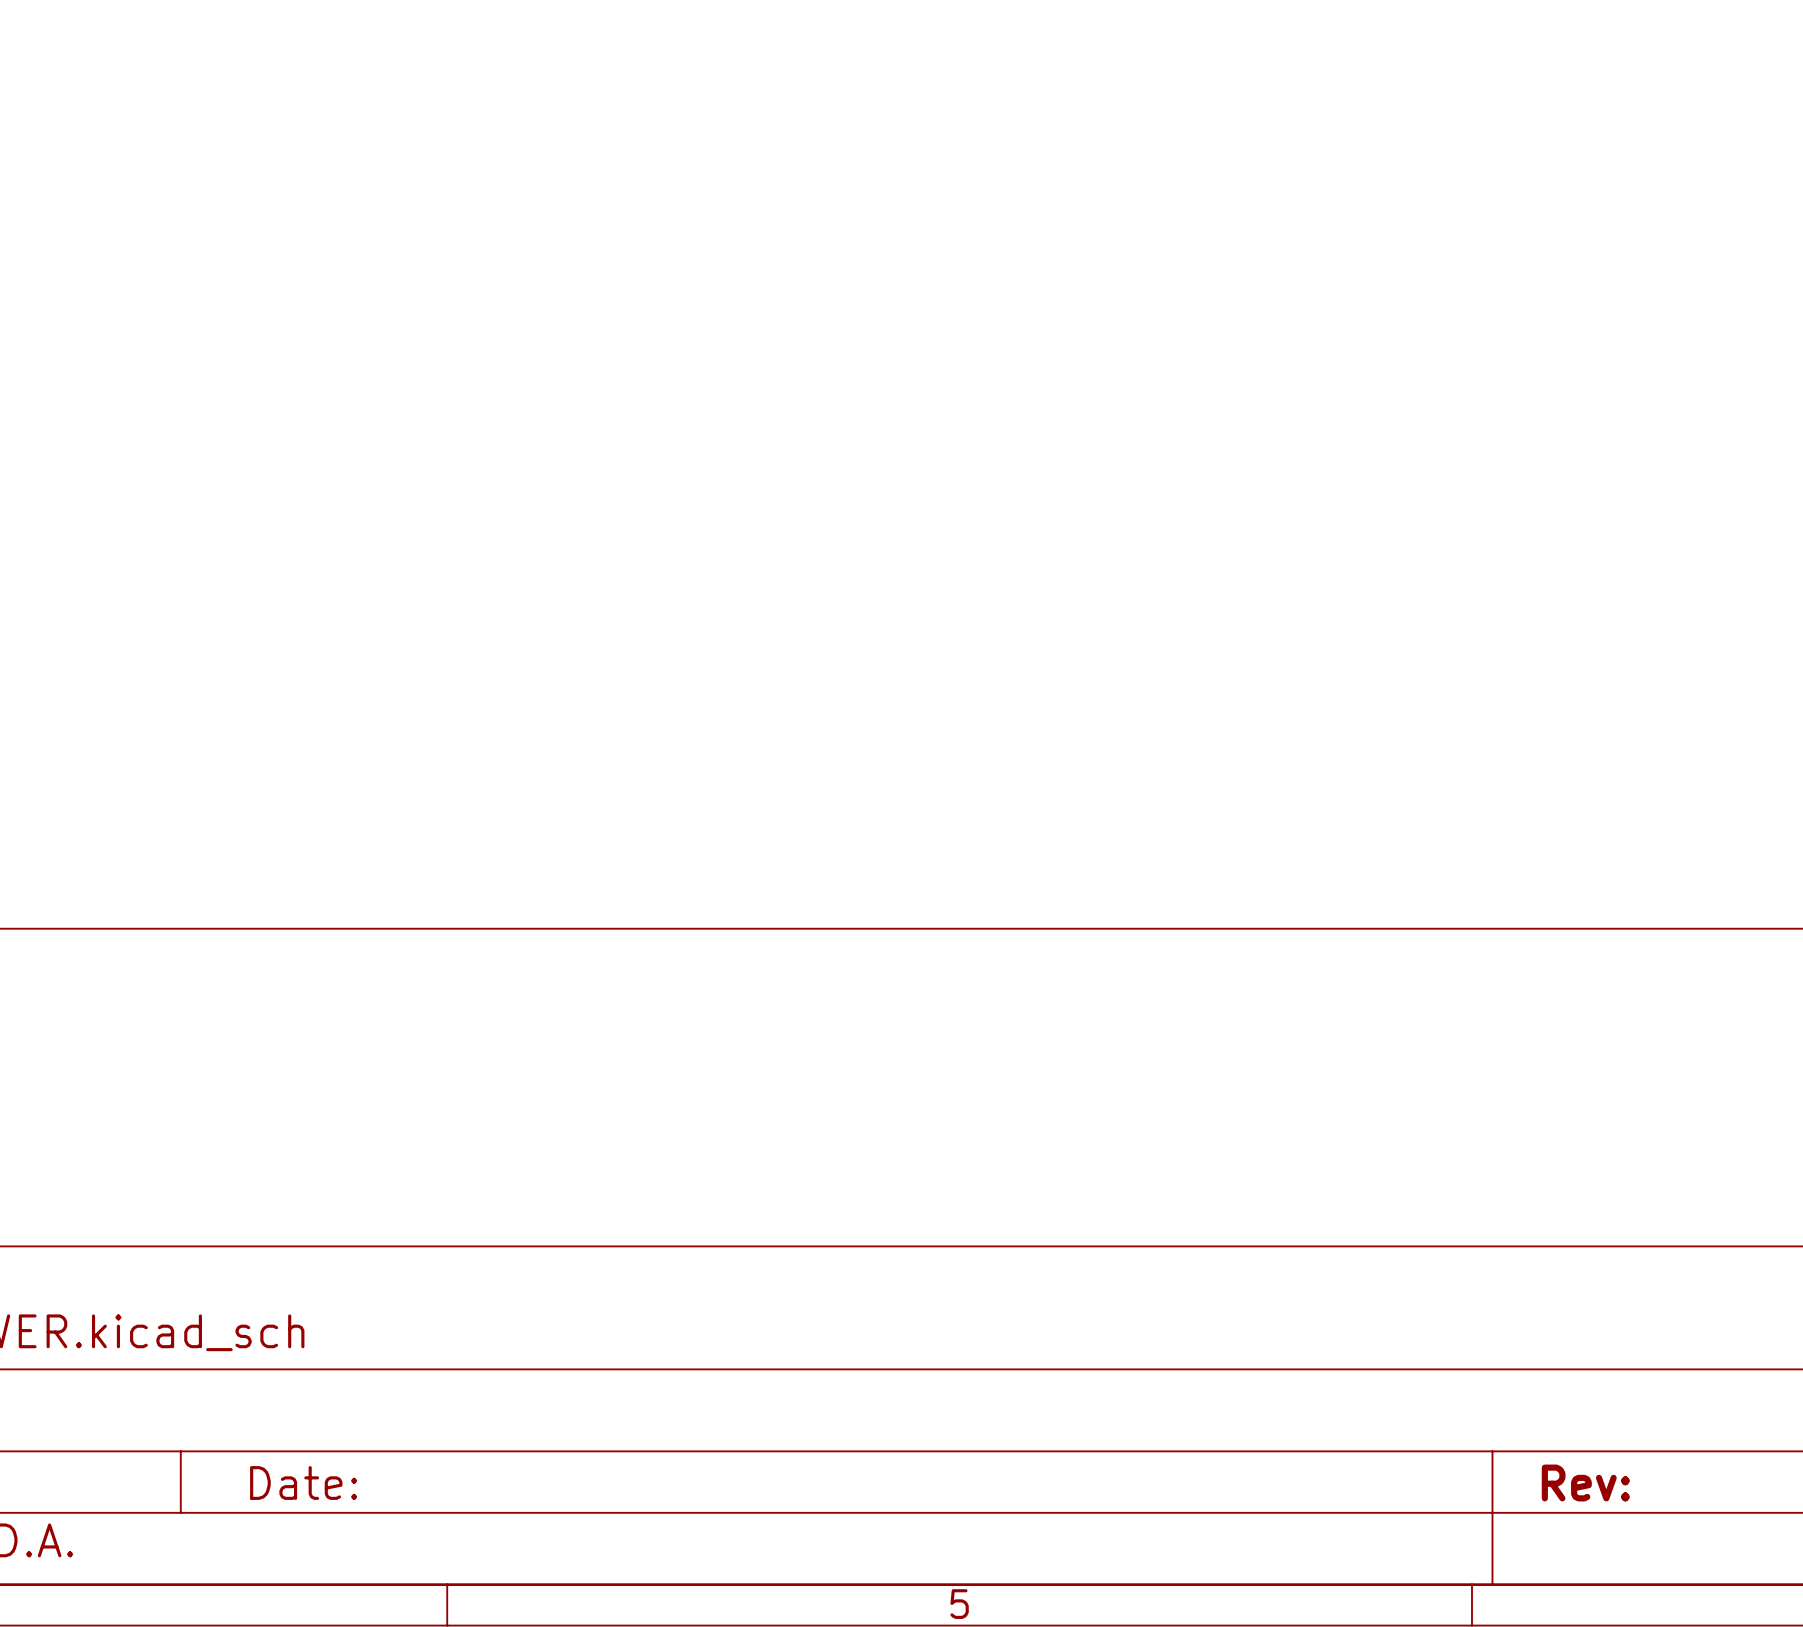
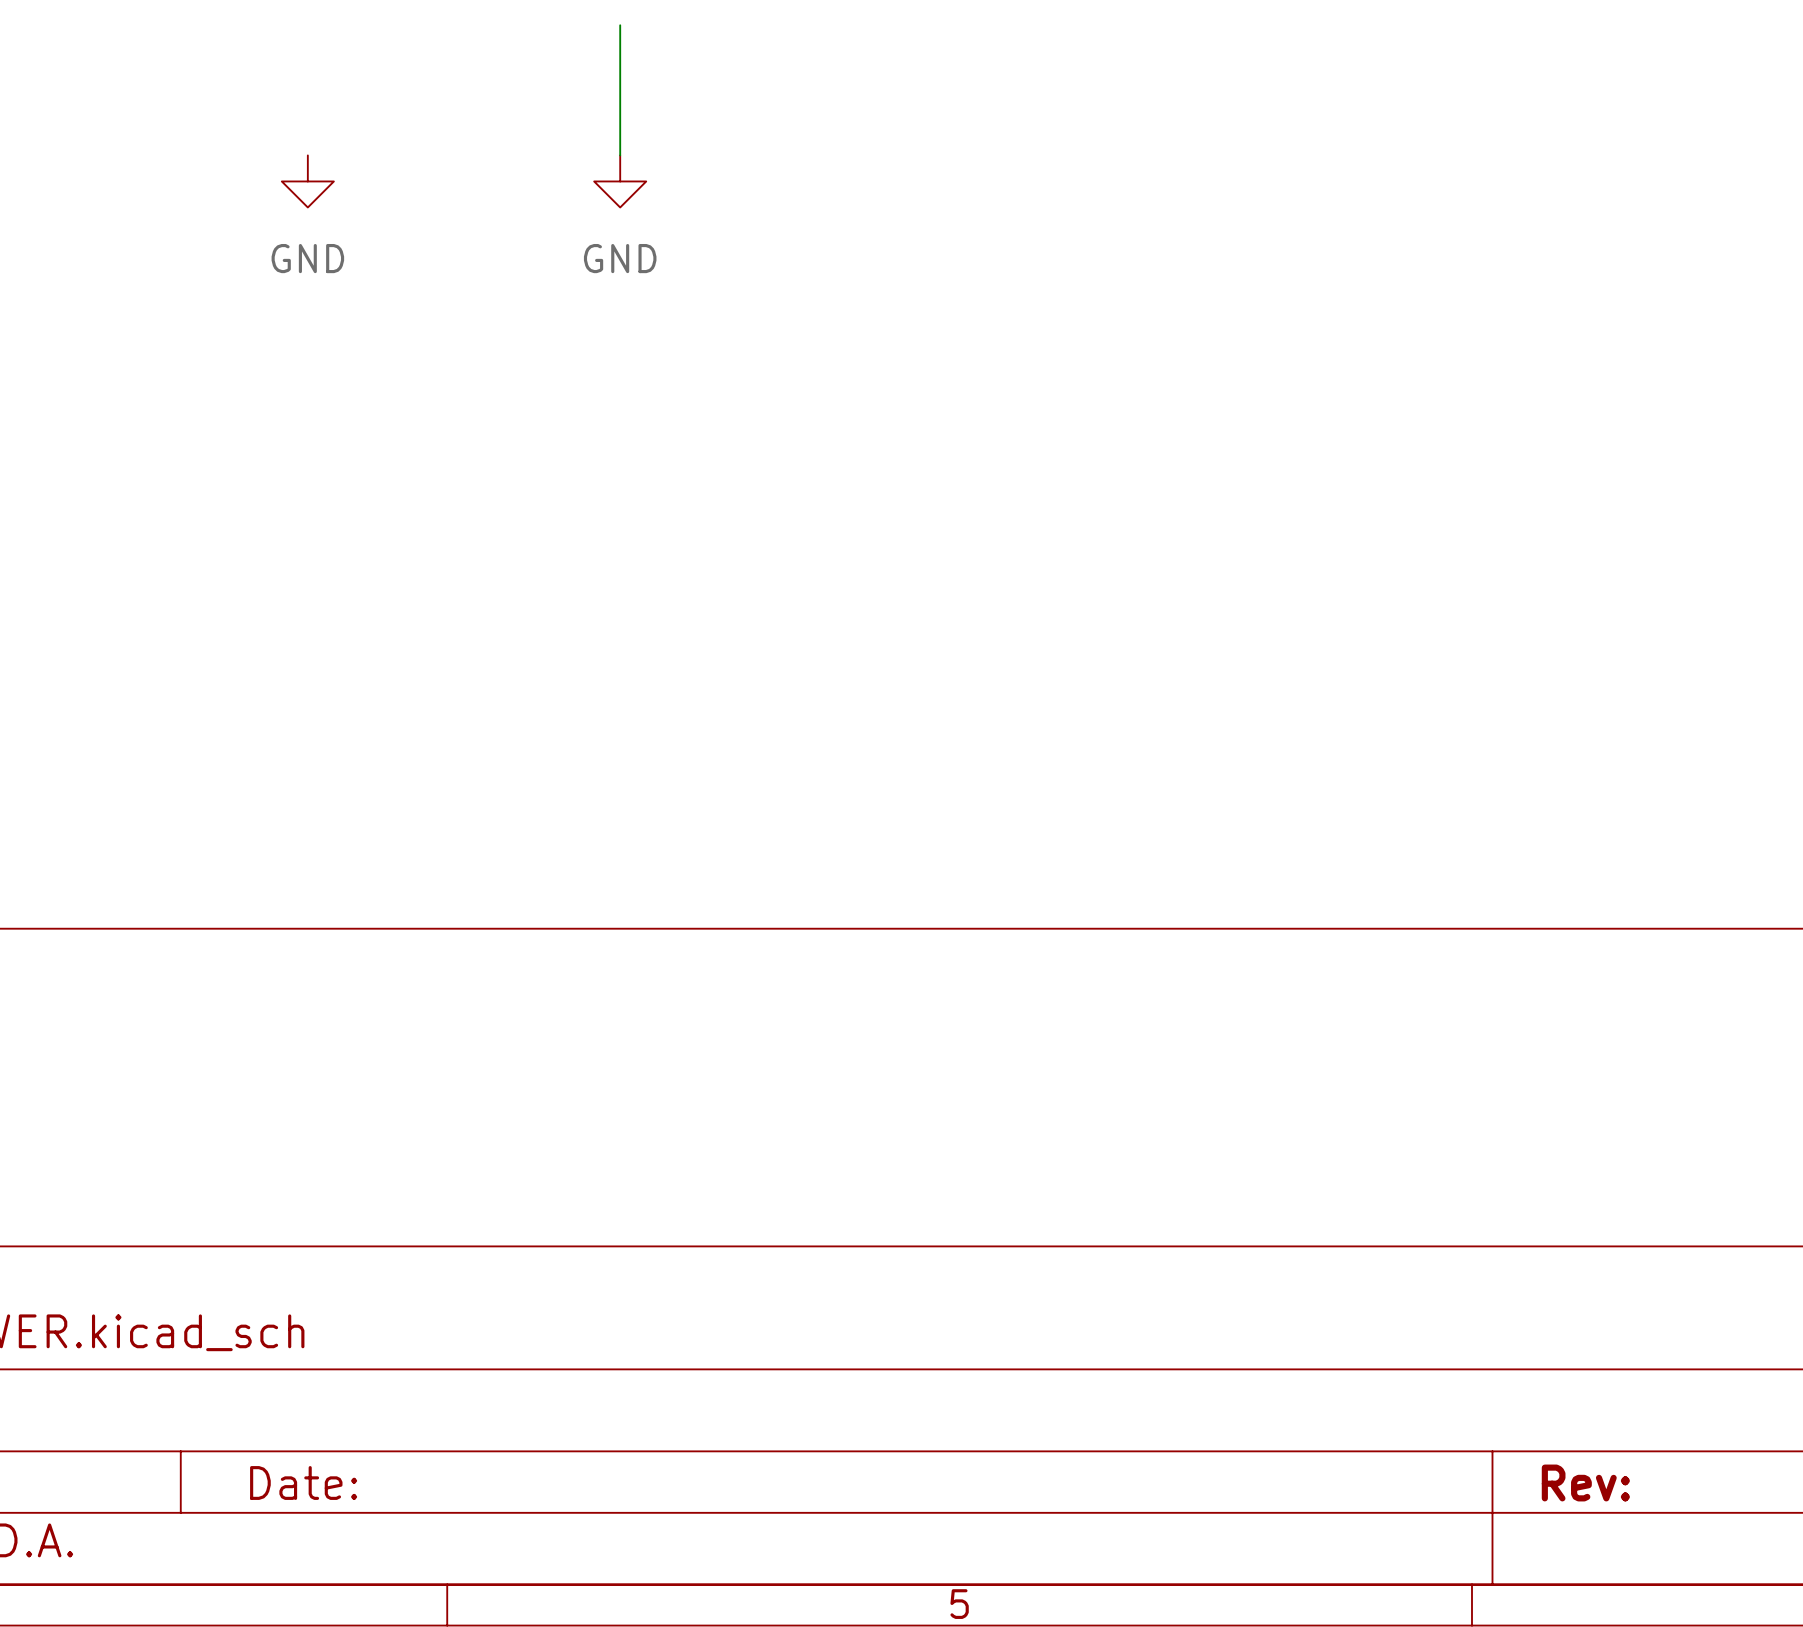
wire: none -> (620, 25) (620, 155)
power symbol: none -> GND (307, 181)
power symbol: none -> GND (620, 181)

